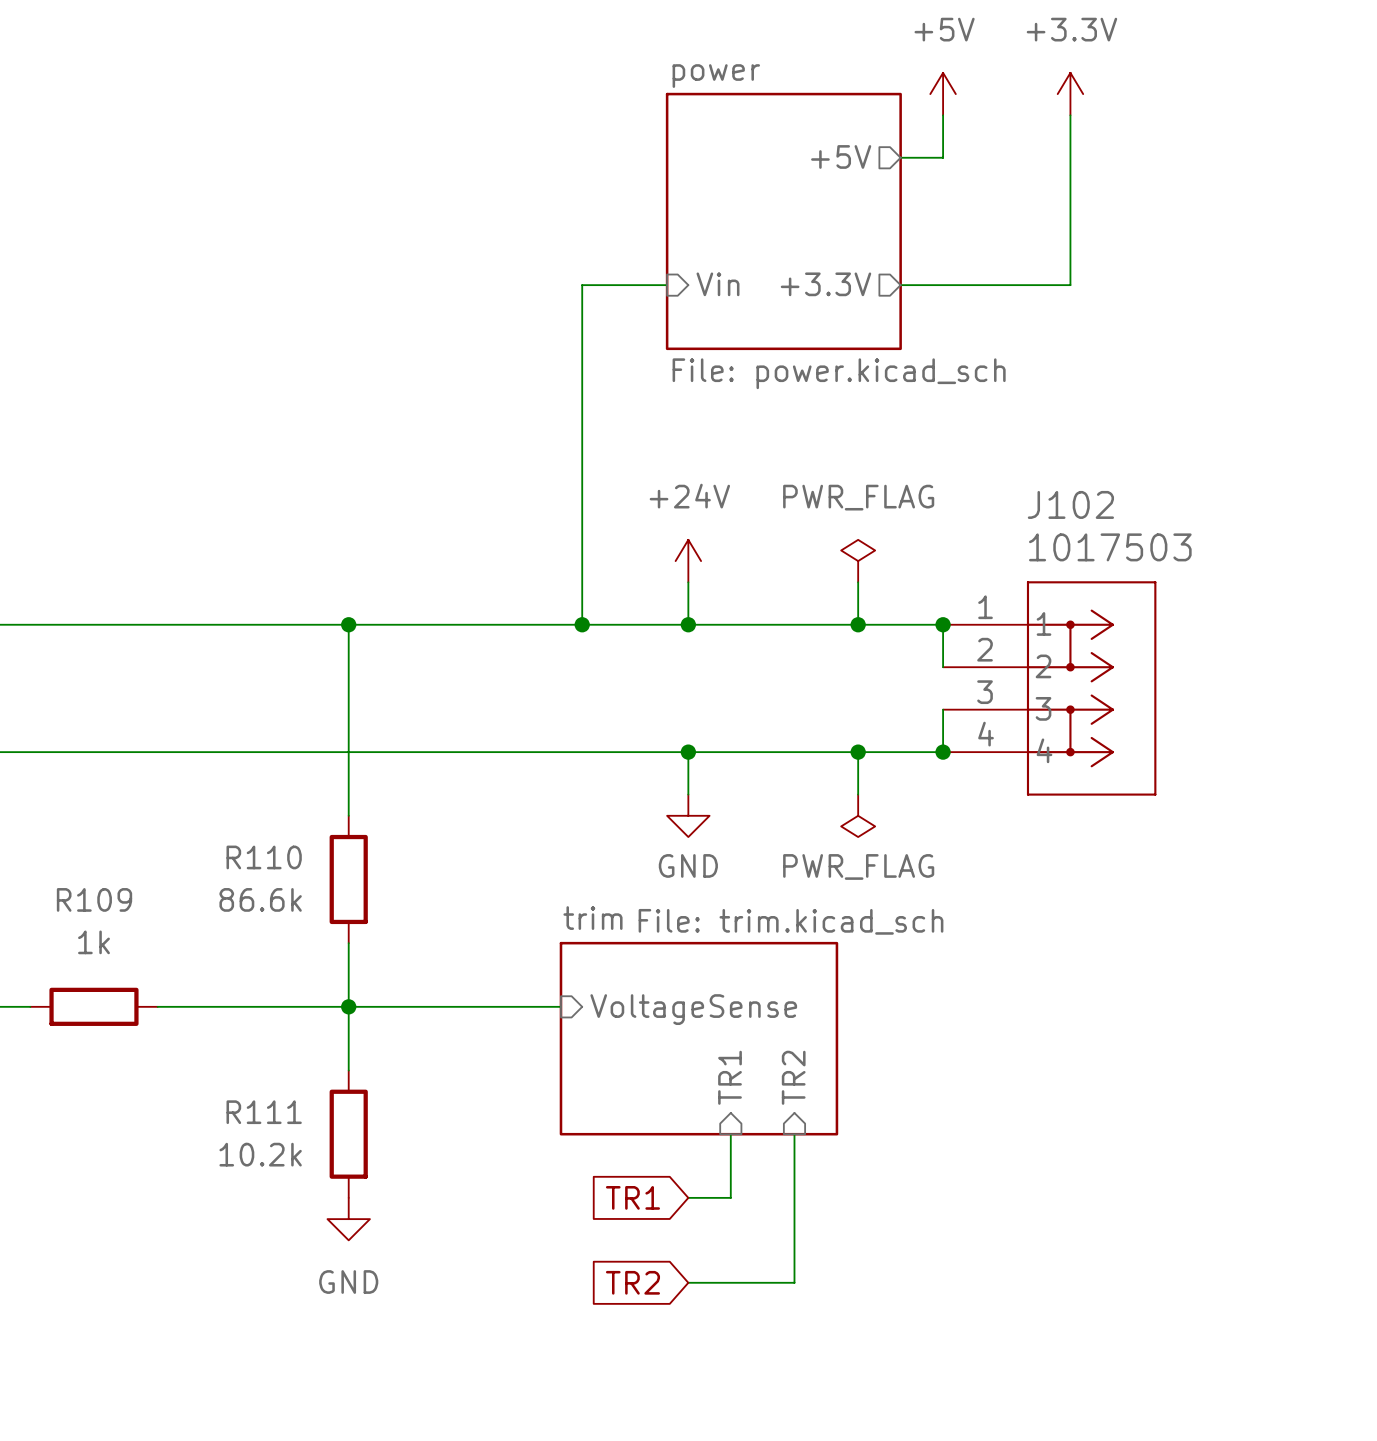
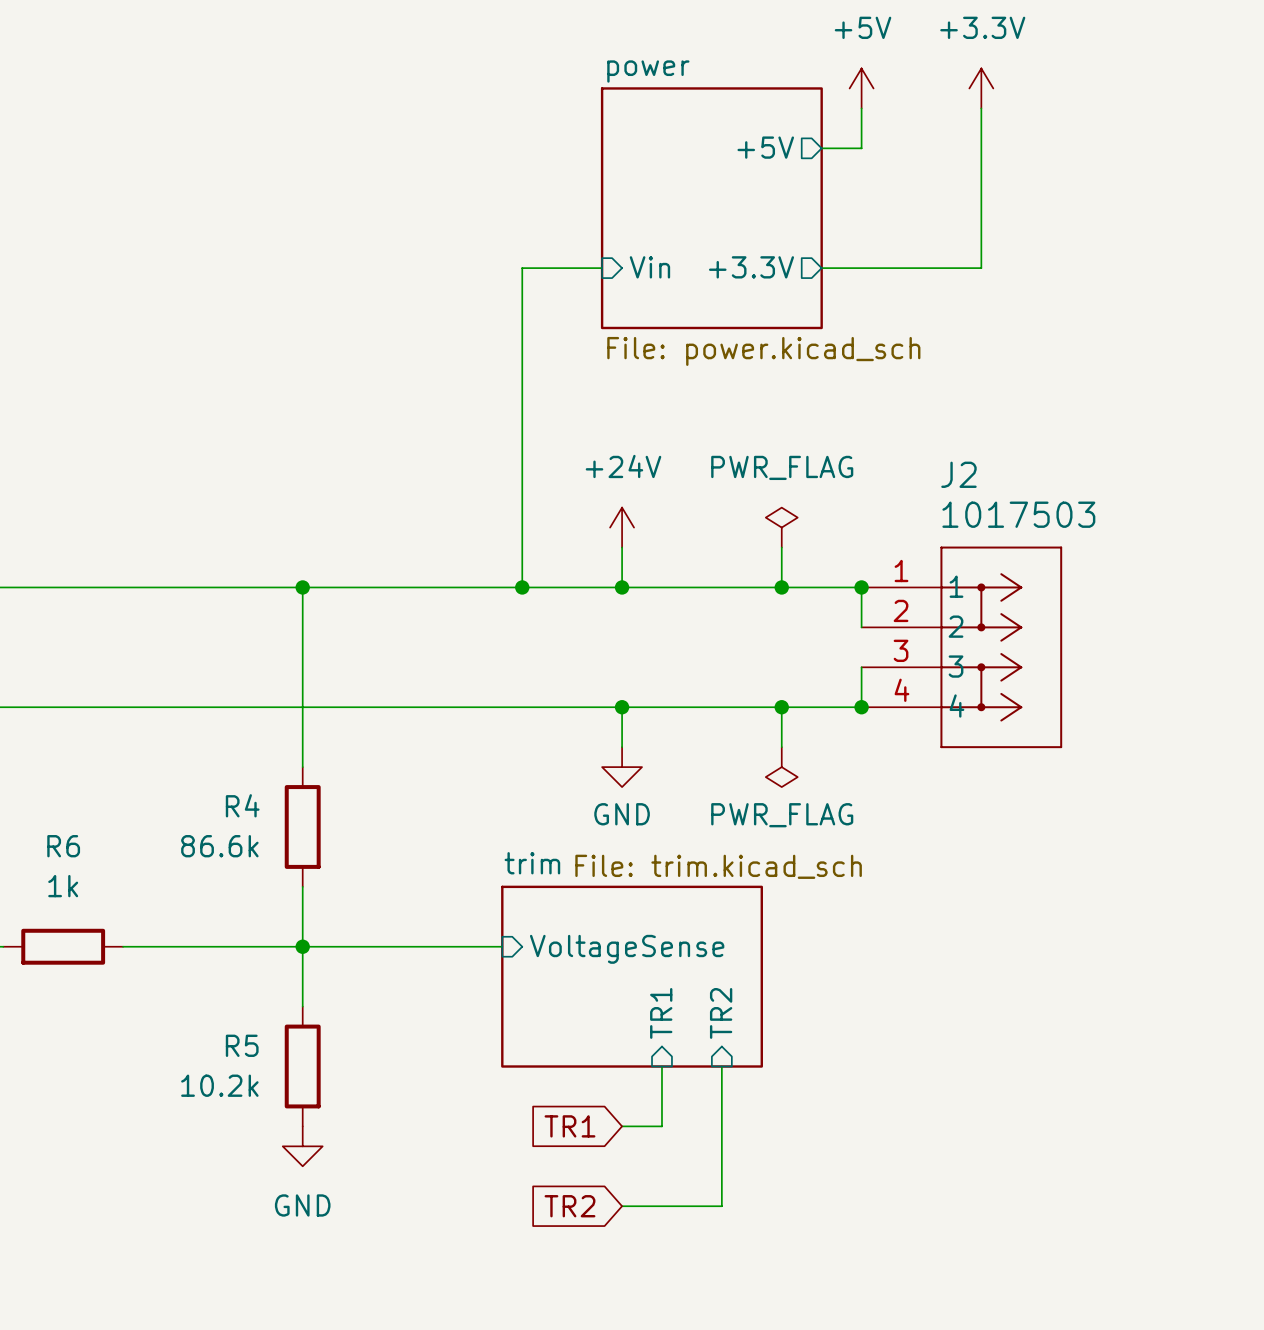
J102 name: J102 (1070, 504) -> J2 (958, 474)
R110 name: R110 (264, 857) -> R4 (242, 805)
R109 name: R109 (94, 899) -> R6 (63, 846)
R111 name: R111 (264, 1112) -> R5 (242, 1045)

